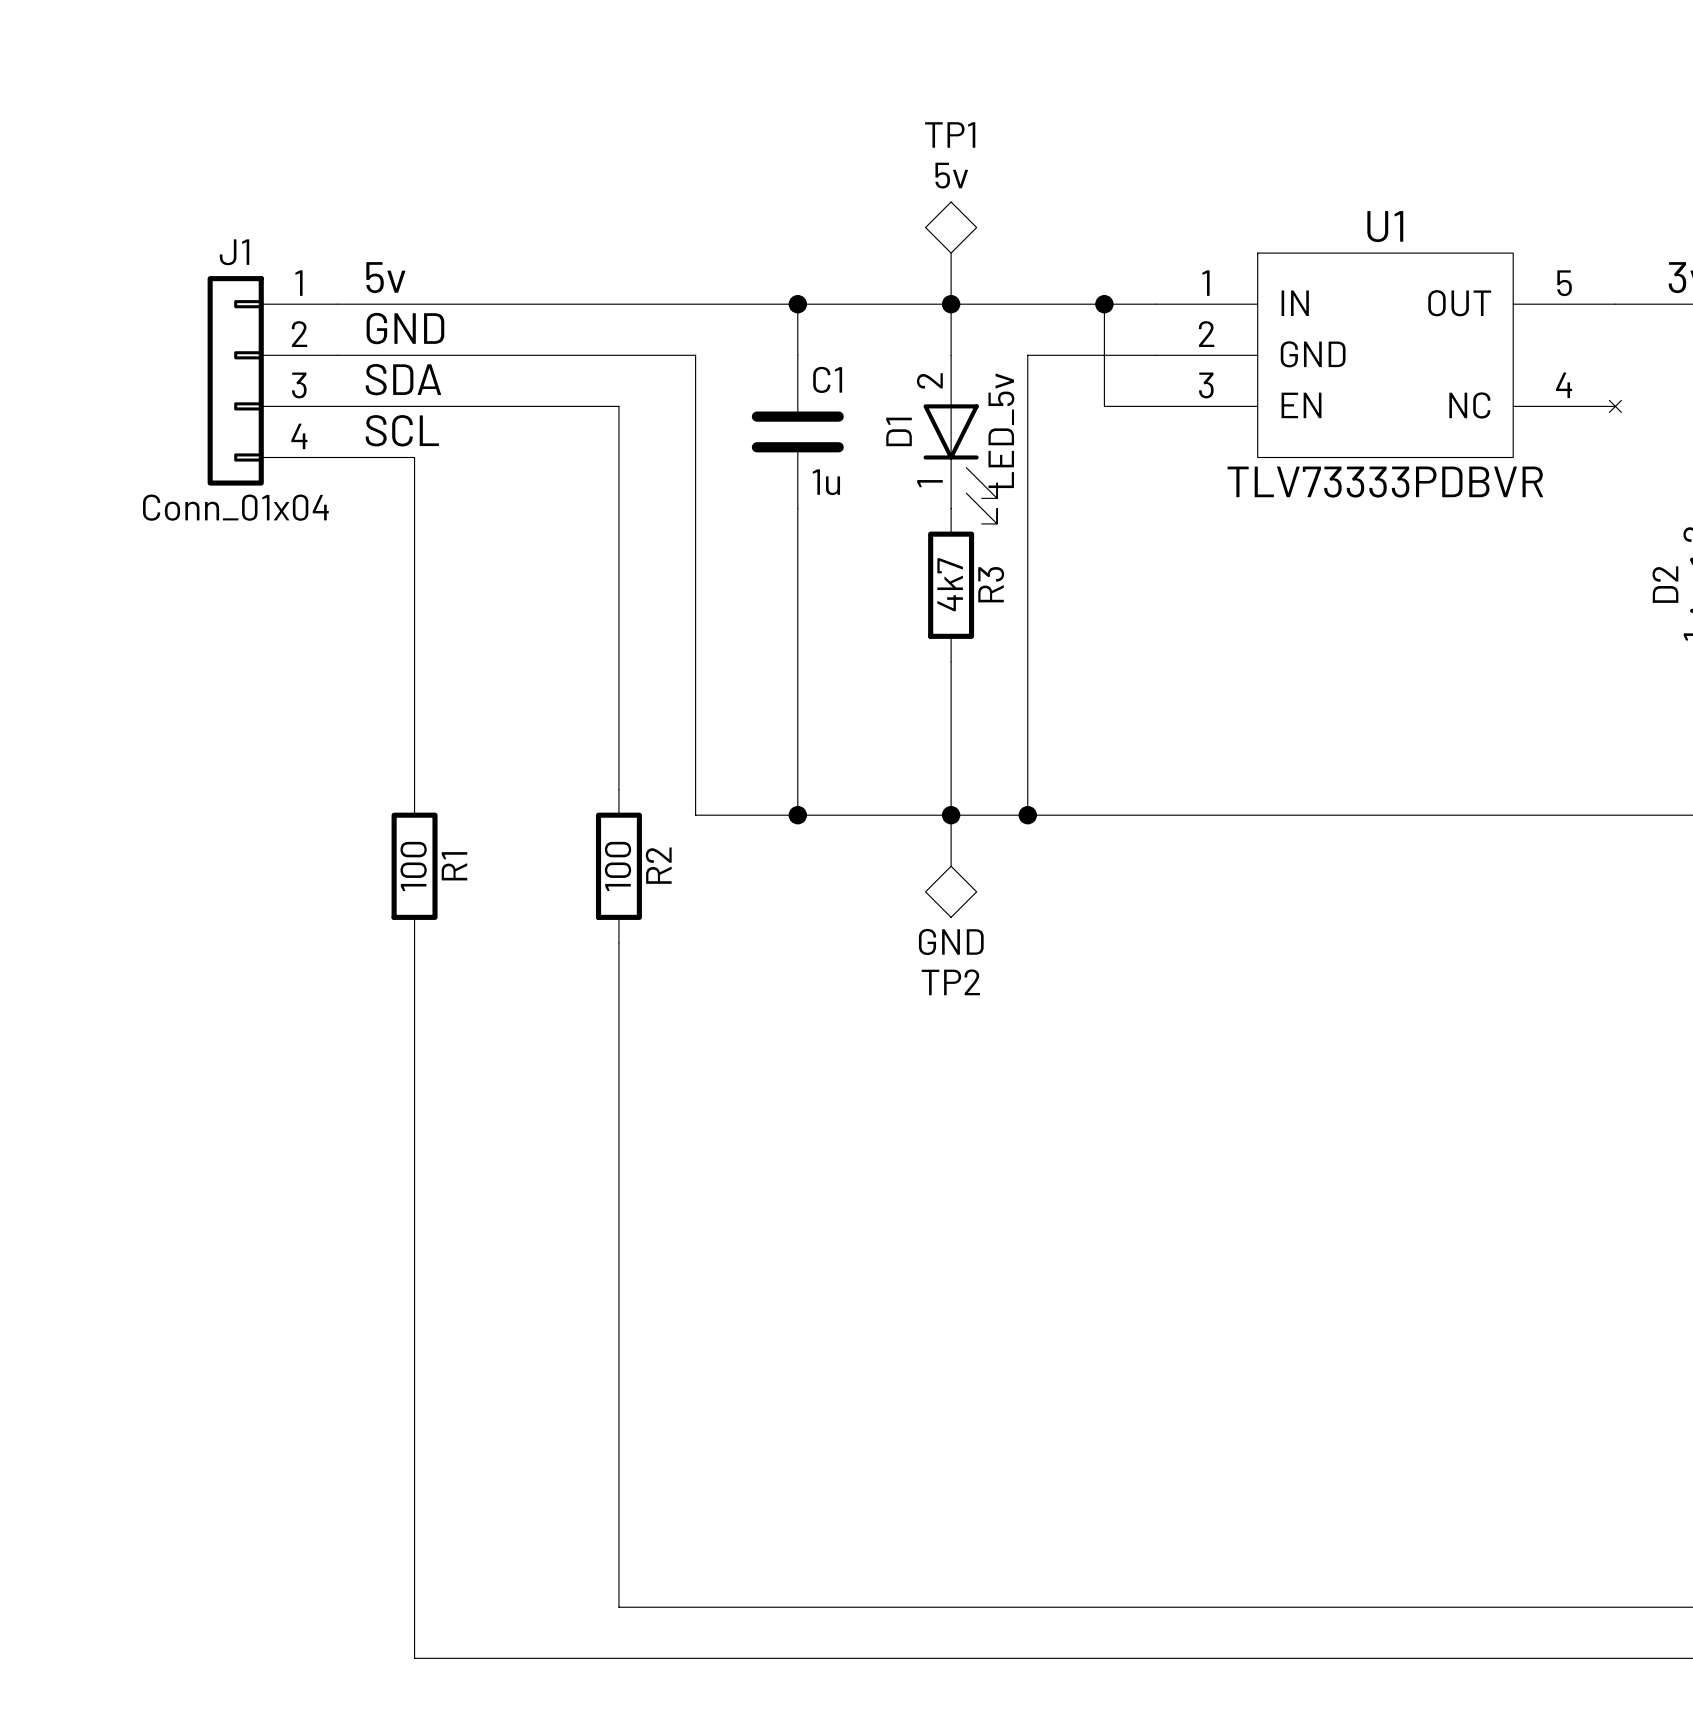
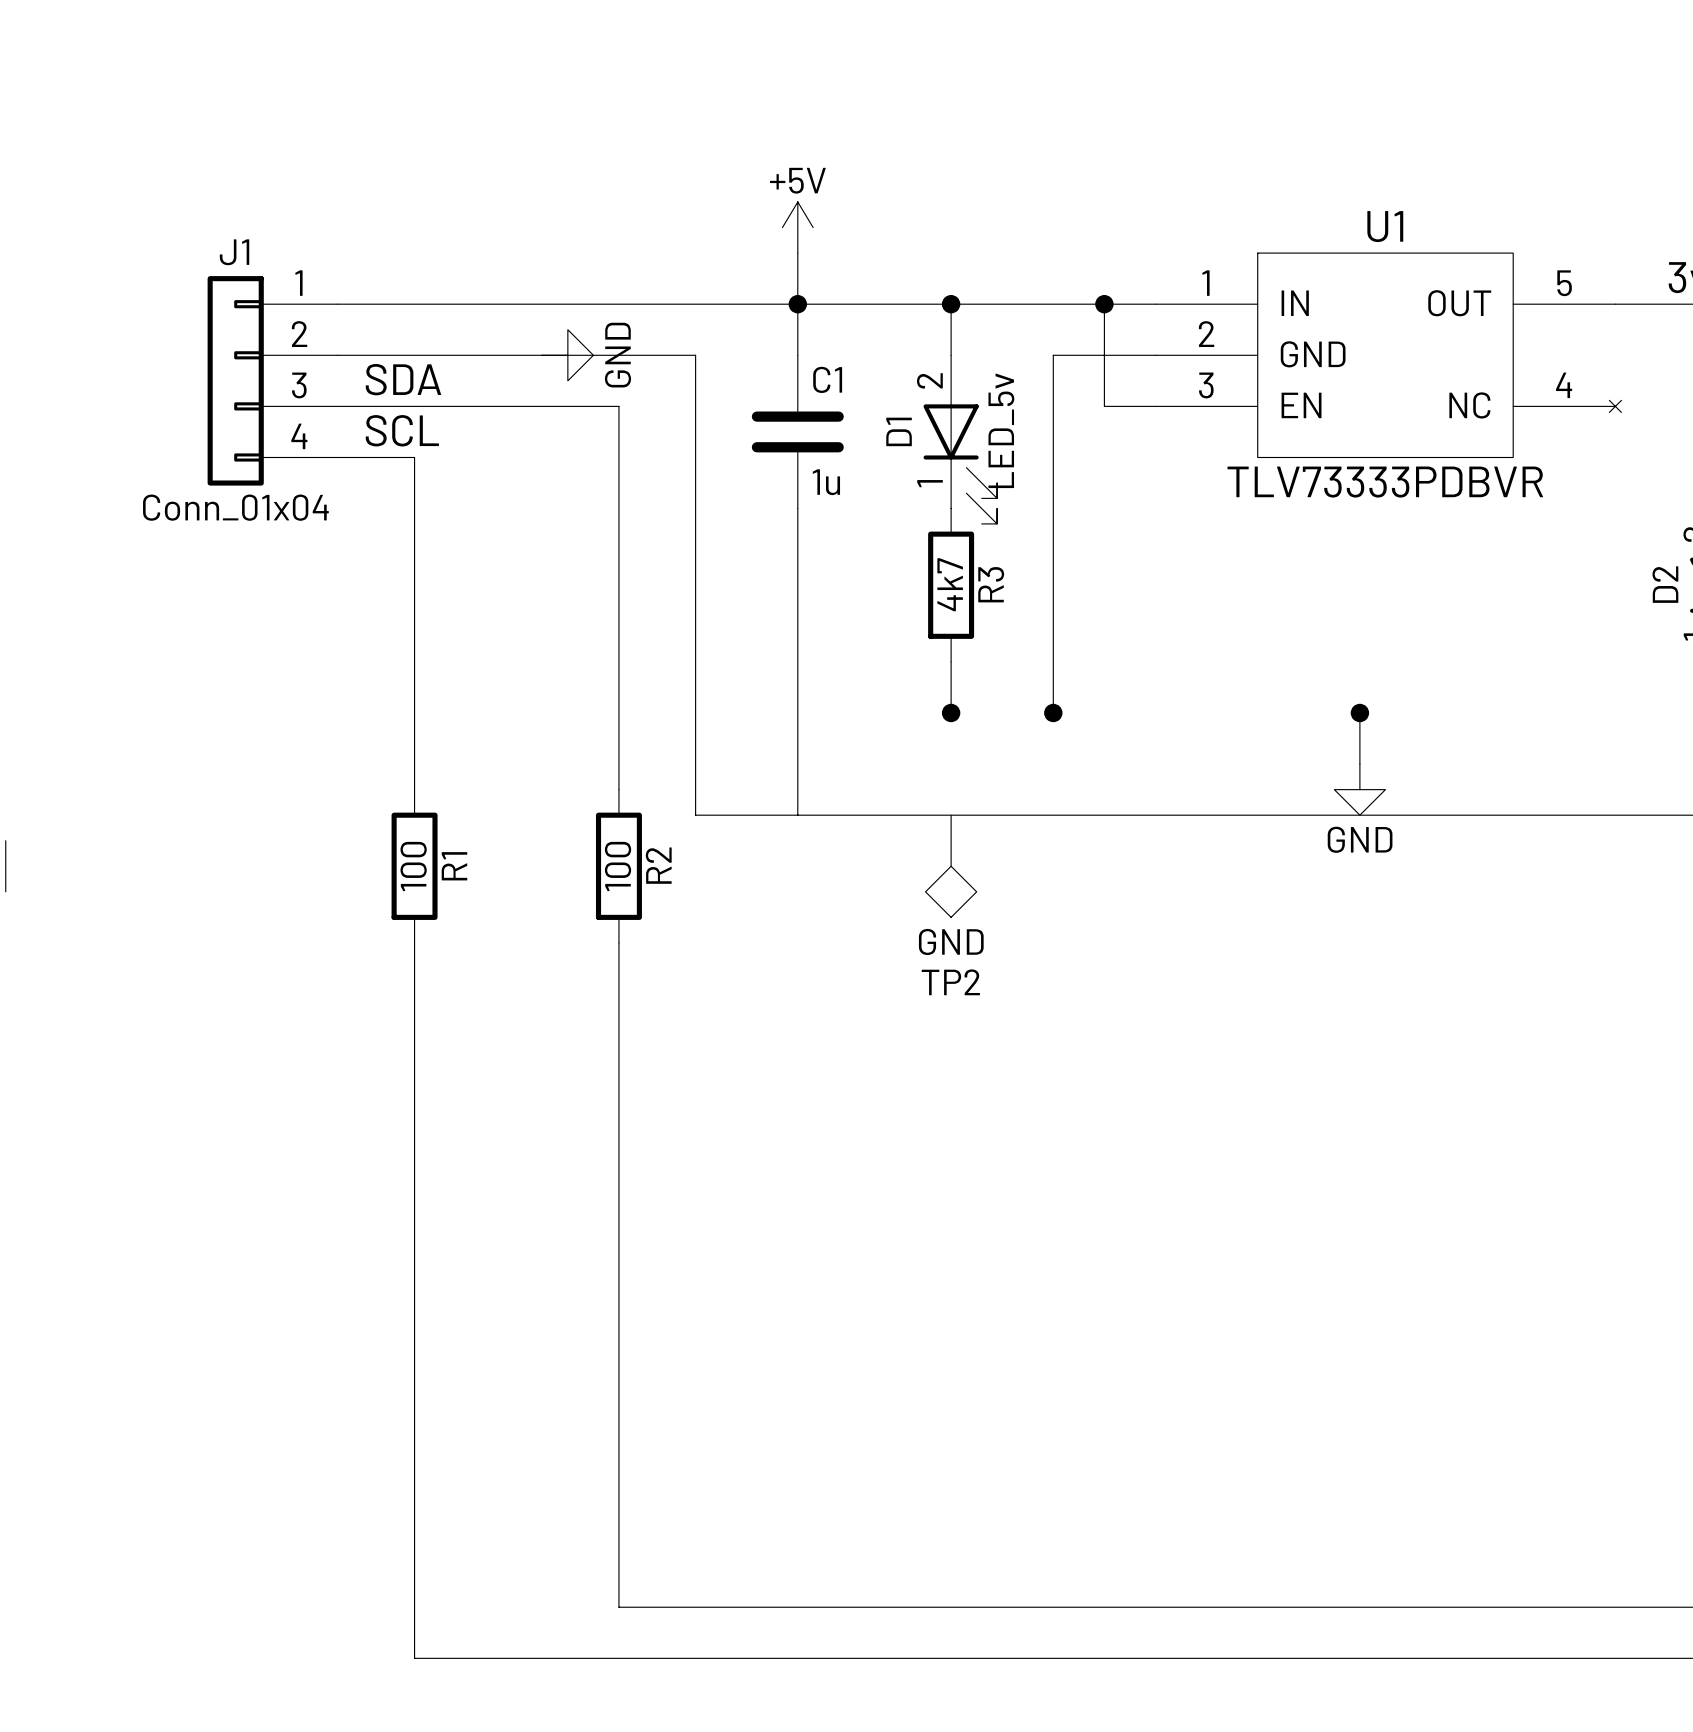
power symbol: none -> +5V (797, 227)
wire: none -> (797, 253) (797, 304)
TP1: 5v (951, 253) -> none
label: 5v (385, 277) -> none
label: GND (405, 328) -> none
power symbol: none -> GND (567, 355)
wire: (1053, 355) (1027, 355) (1027, 815) -> (1053, 355) (1053, 712)
wire: (951, 712) (951, 815) -> none
junction: none -> (951, 712)
junction: none -> (1053, 712)
wire: none -> (1359, 712) (1359, 764)
junction: none -> (1359, 712)
power symbol: none -> GND (1359, 789)
junction: (797, 815) -> none
junction: (951, 815) -> none
junction: (1027, 815) -> none
wire: none -> (5, 840) (5, 891)

